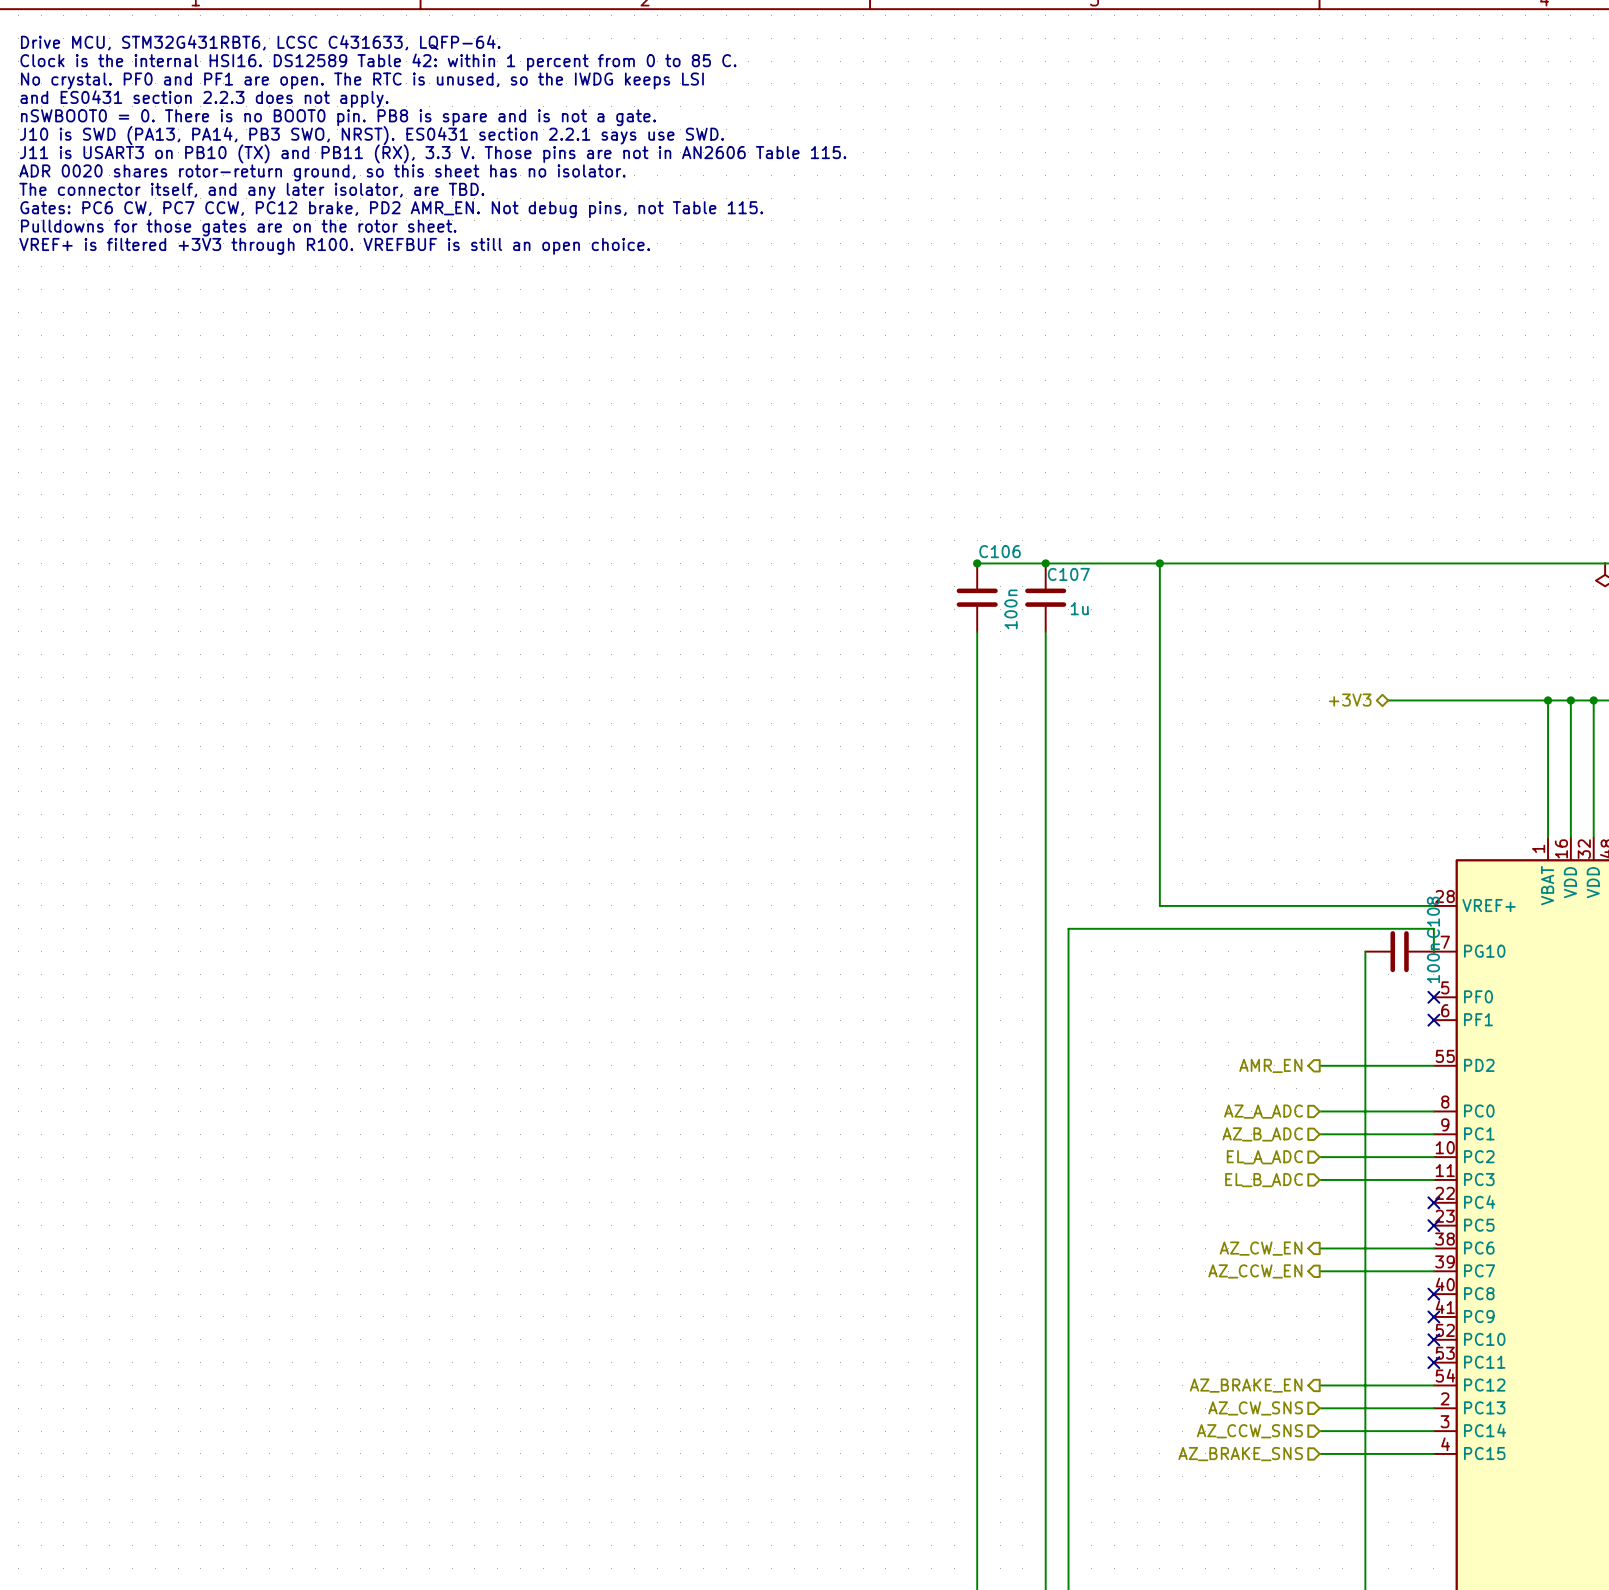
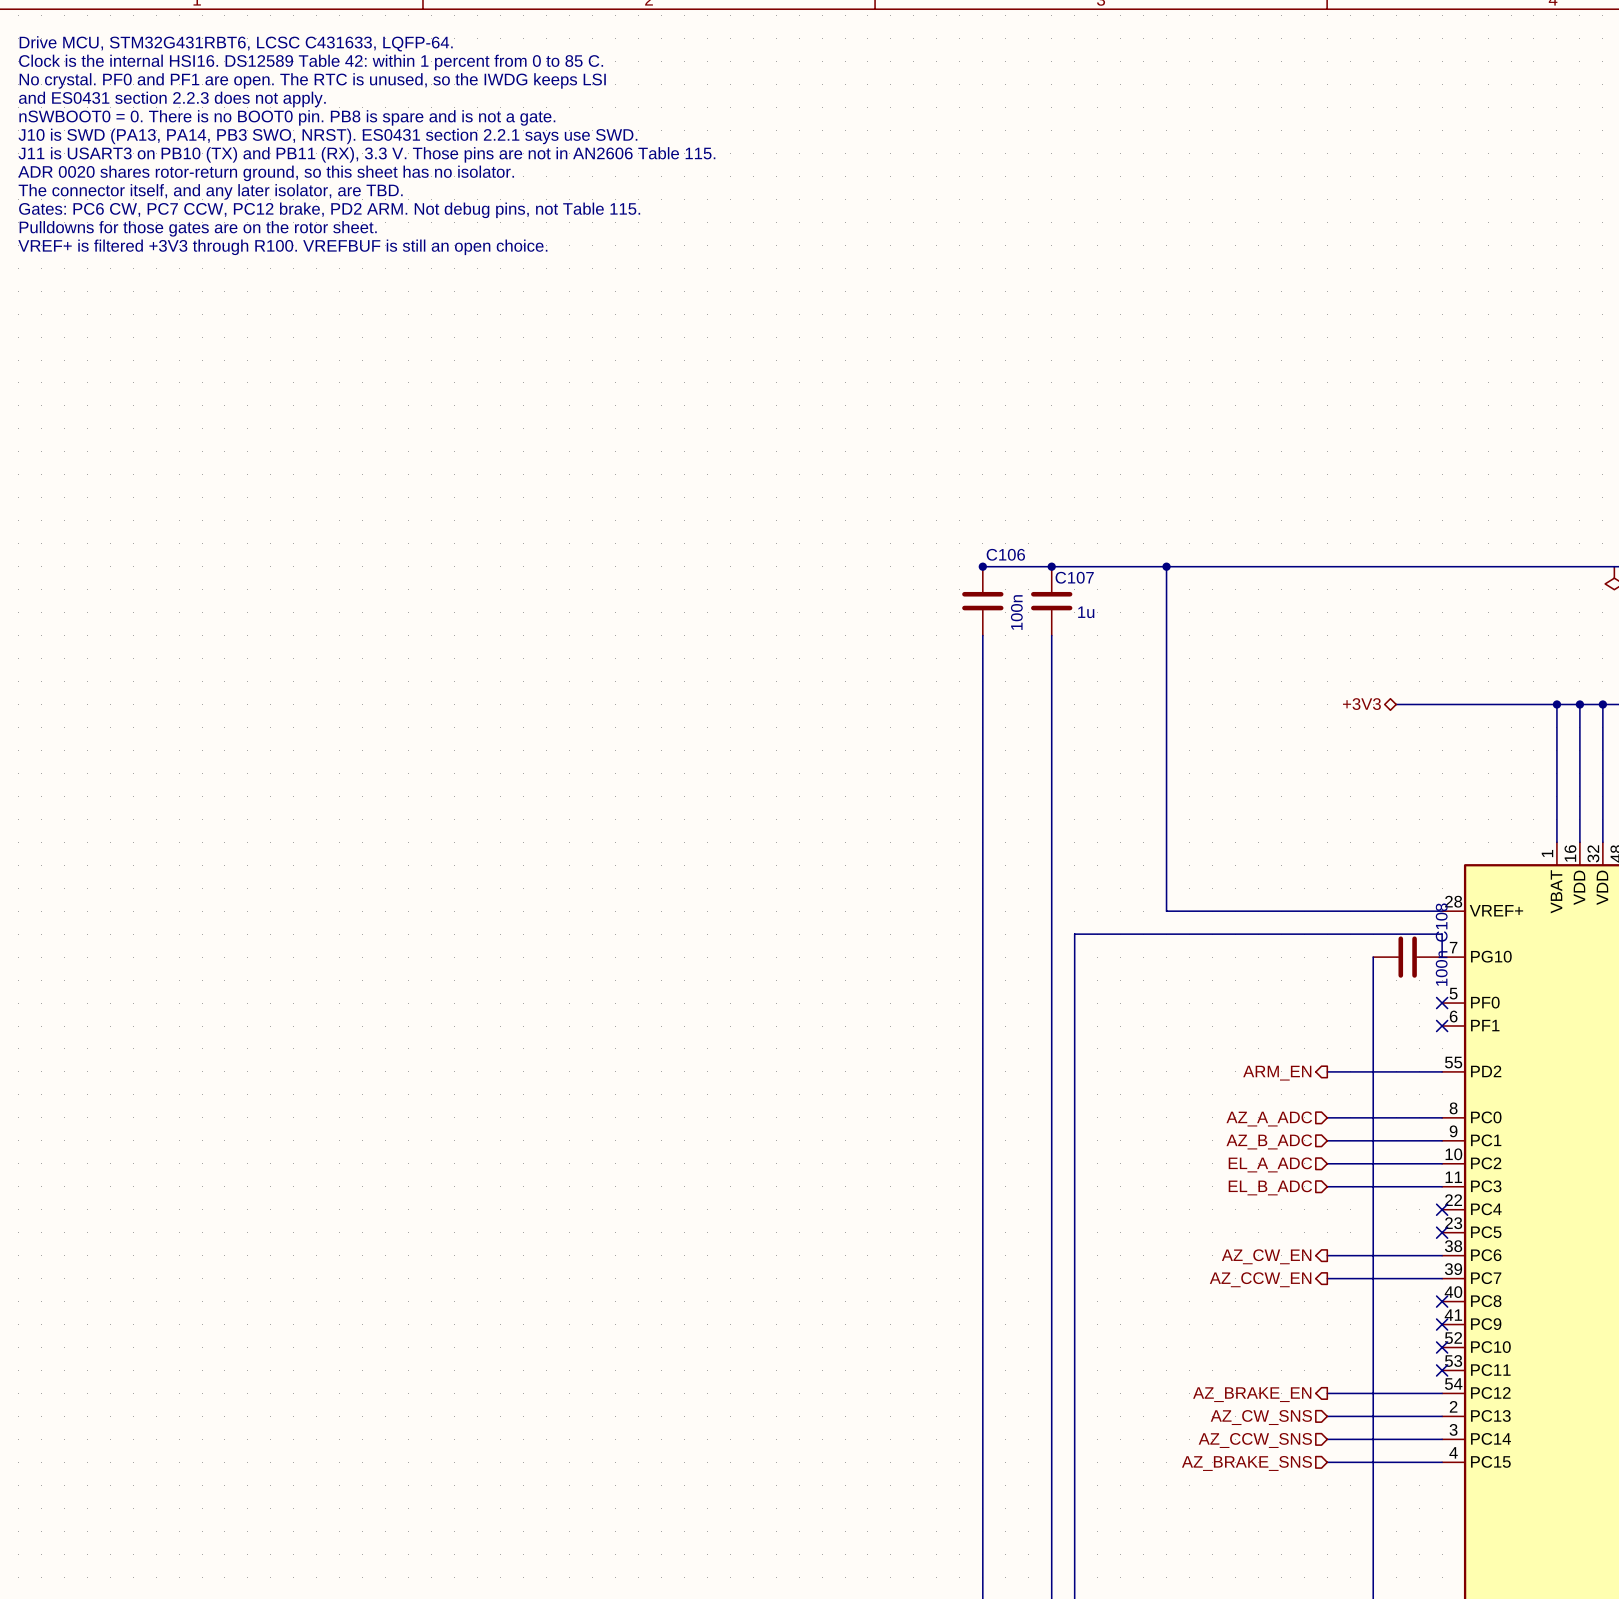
text: Gates: PC6 CW, PC7 CCW, PC12 brake, PD2 AMR_EN. Not debug pins, not Table 115. (391, 209) -> Gates: PC6 CW, PC7 CCW, PC12 brake, PD2 ARM. Not debug pins, not Table 115. (329, 210)
hierarchical label: AMR_EN (1270, 1065) -> ARM_EN (1277, 1073)

